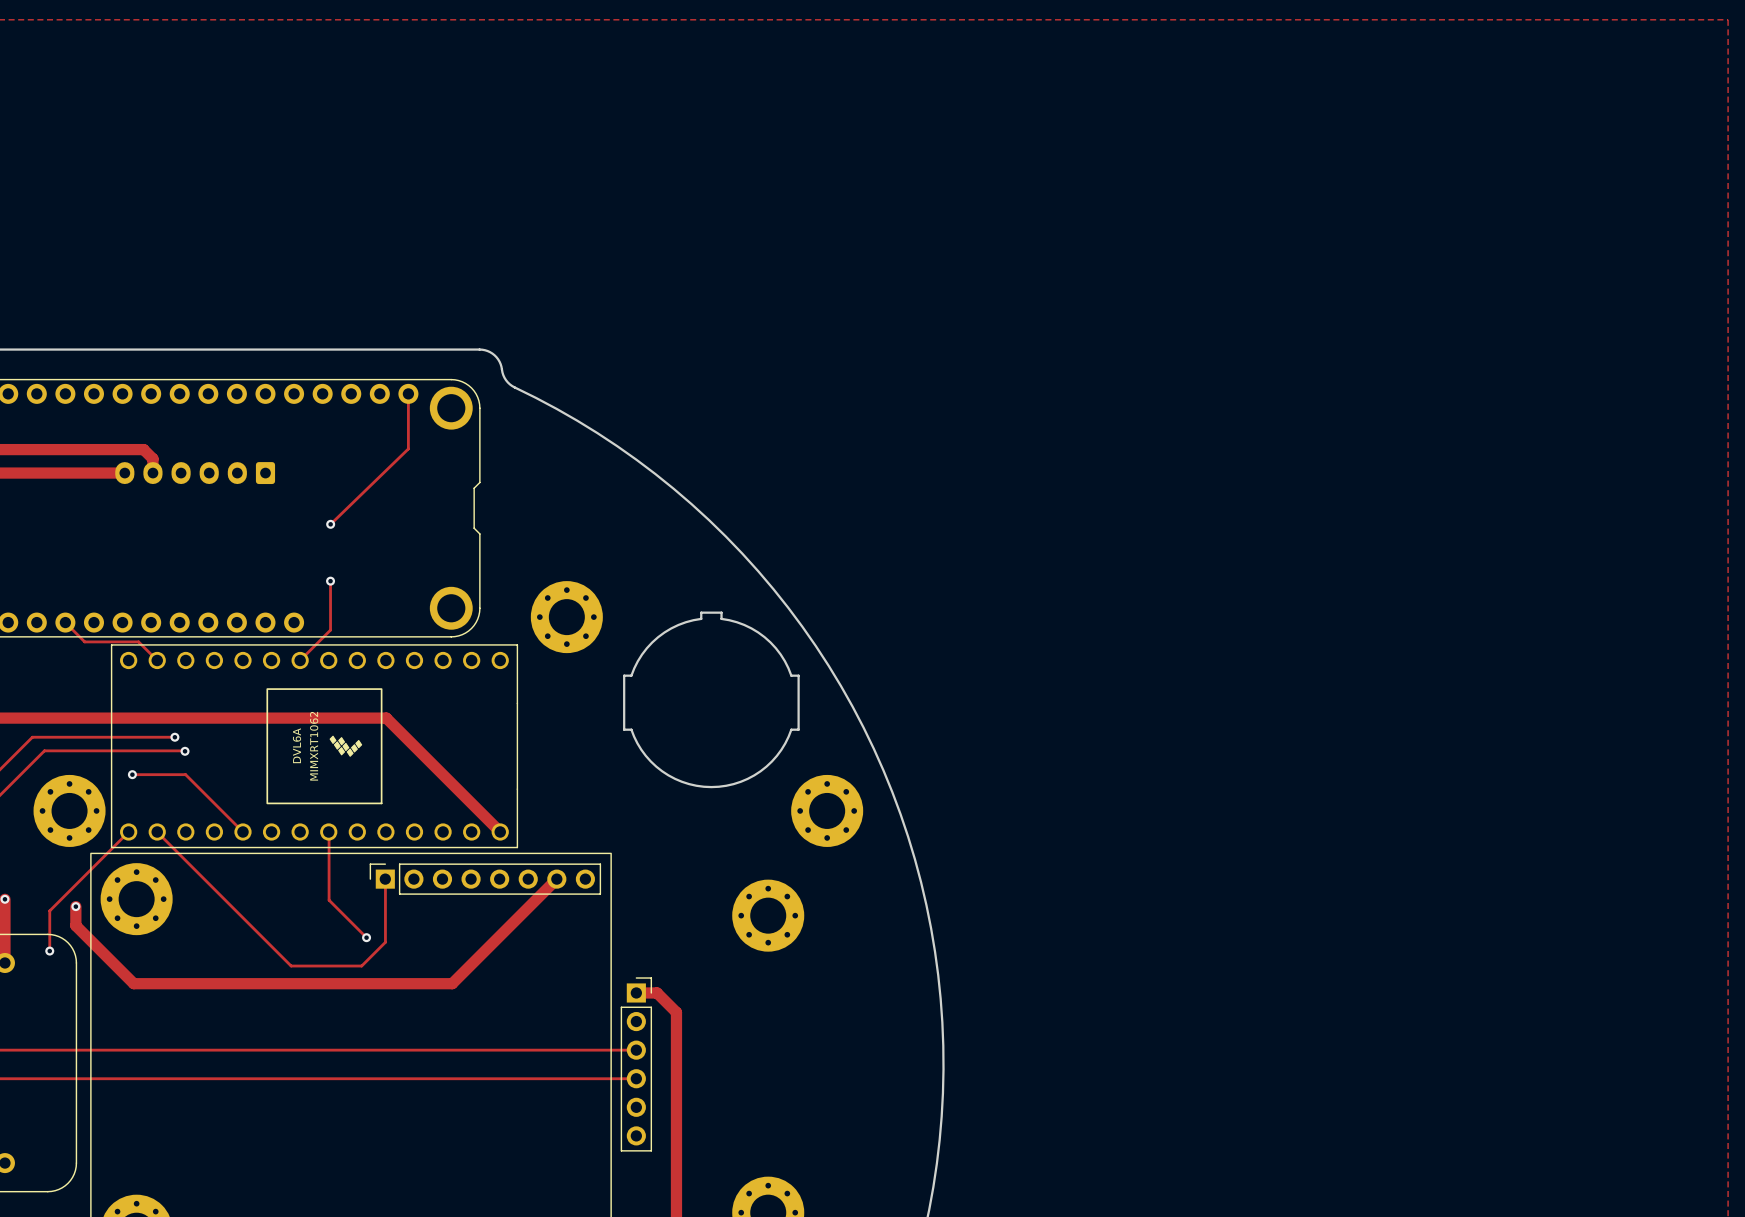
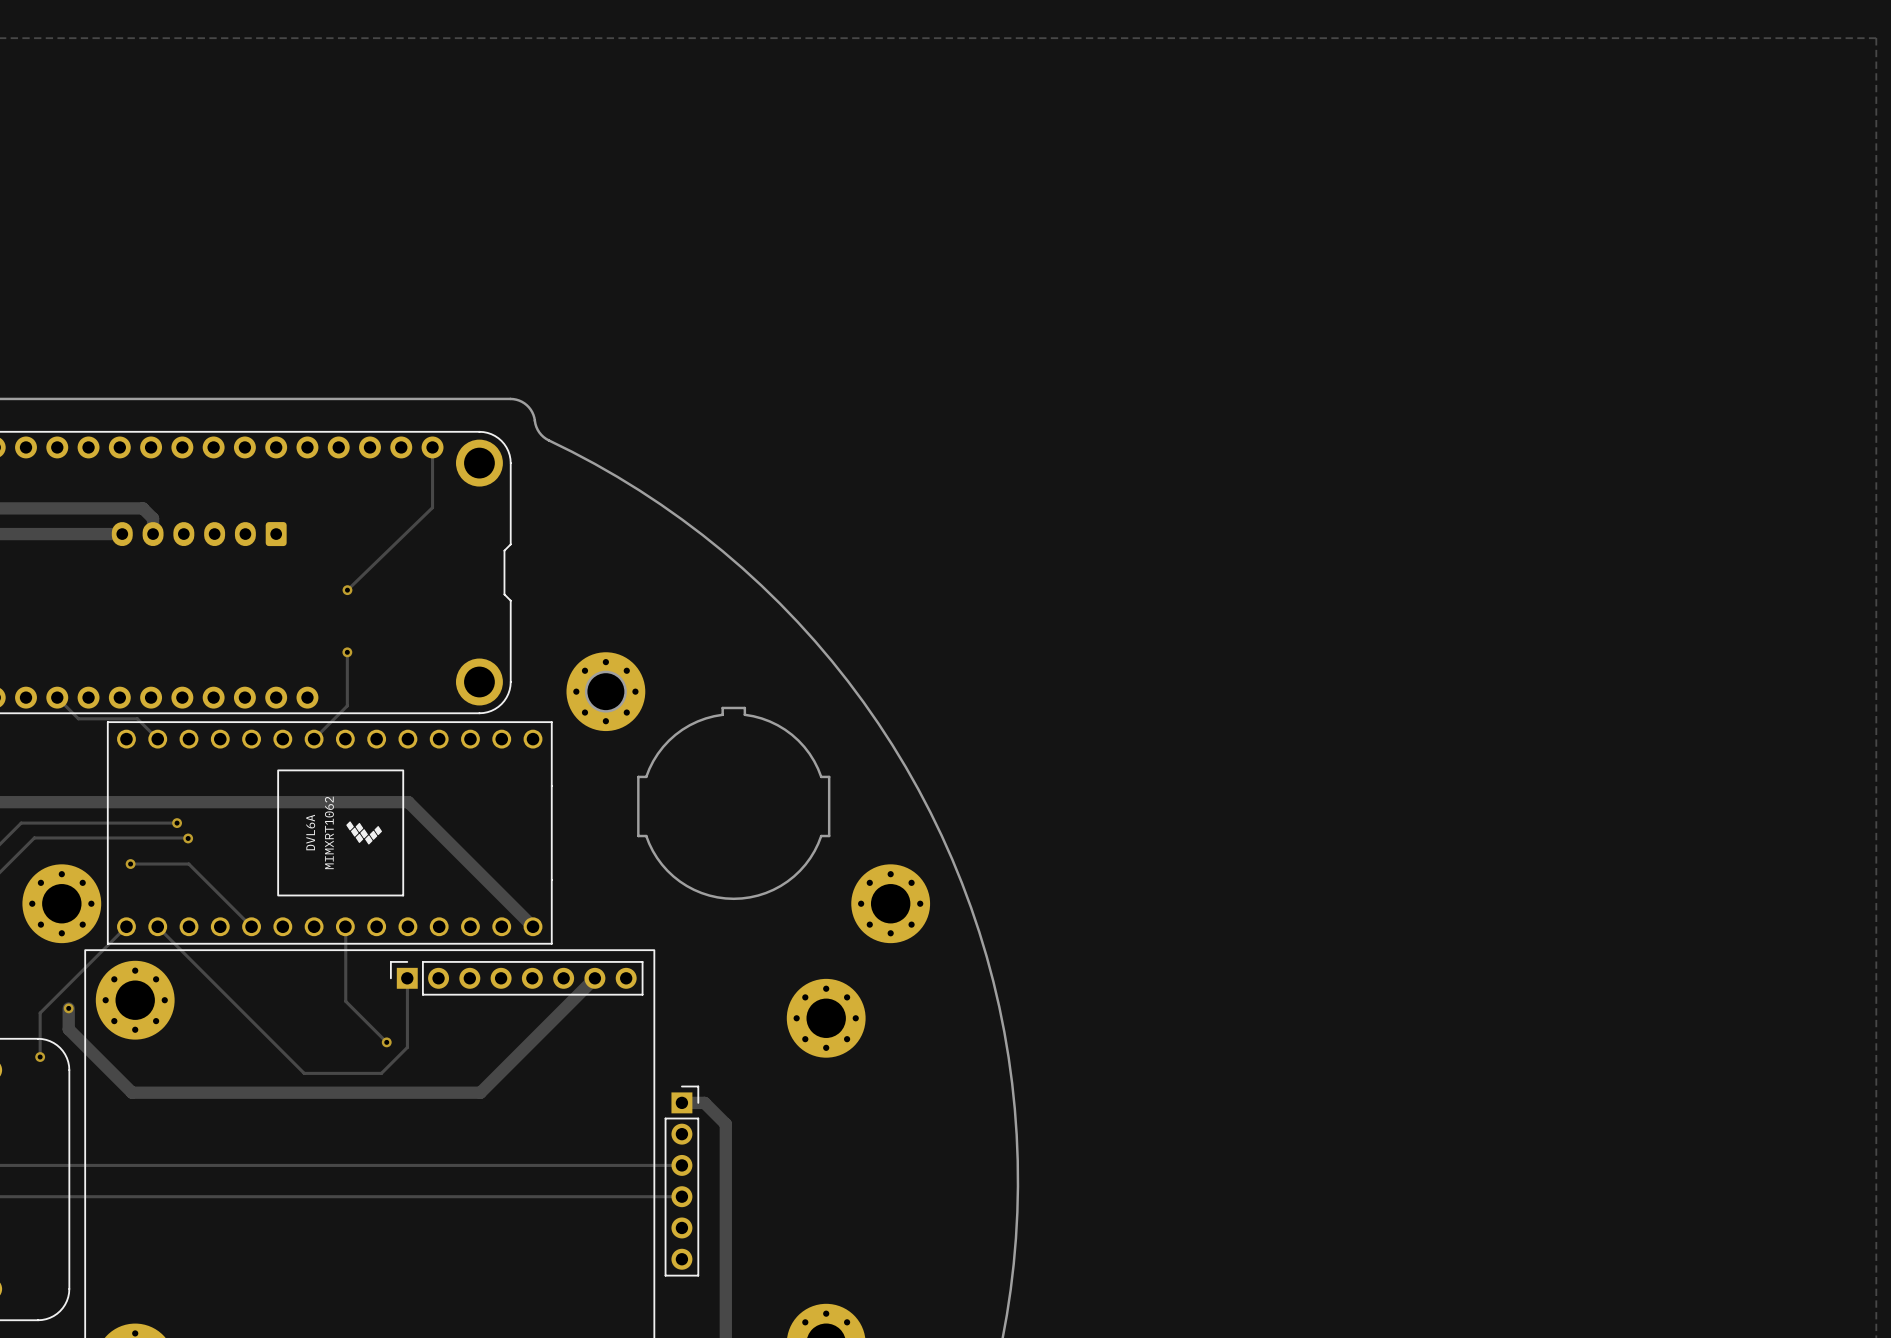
round board edge: none -> [584, 670, 627, 713]
board edge: (701, 612) (701, 618) (678, 624) (658, 637) (642, 654) (631, 675) (624, 675) (624, 729) (631, 729) (645, 755) (668, 775) (696, 785) (718, 786) (740, 781) (760, 771) (781, 749) (791, 729) (798, 729) (798, 675) (791, 675) (775, 648) (758, 632) (744, 624) (721, 618) (721, 612) (701, 612) -> (722, 707) (722, 714) (697, 721) (675, 734) (657, 753) (646, 776) (638, 776) (638, 836) (646, 836) (662, 864) (686, 885) (717, 897) (741, 898) (765, 893) (787, 881) (810, 858) (821, 836) (829, 836) (829, 776) (821, 776) (809, 753) (798, 740) (785, 729) (761, 718) (744, 714) (744, 707) (722, 707)

